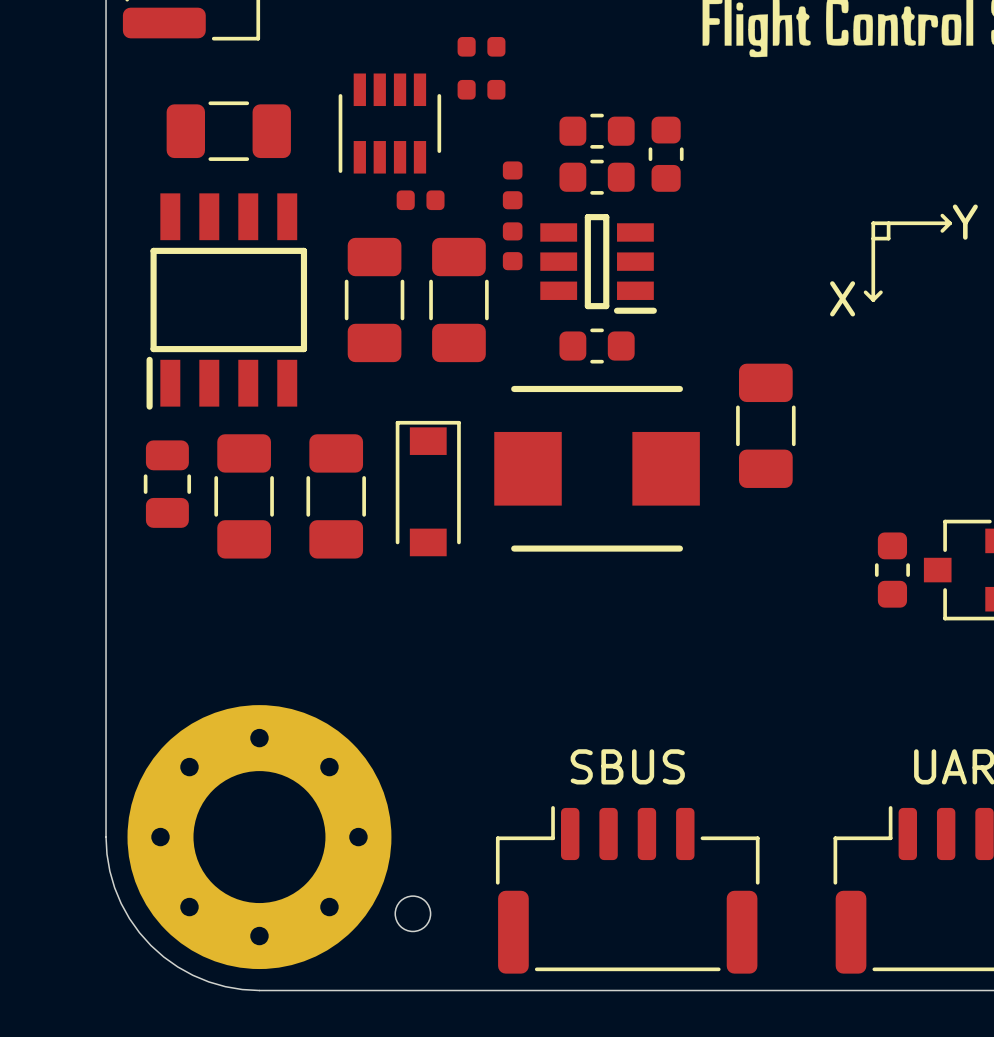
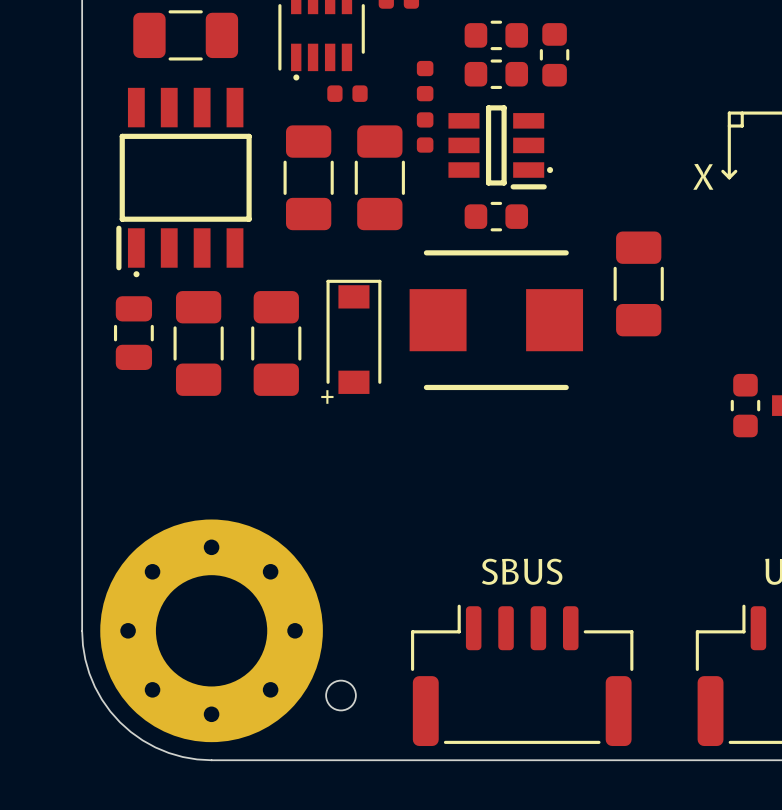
drawing: none -> [293, 74, 300, 81]
drawing: none -> [547, 167, 554, 174]
drawing: none -> [133, 271, 140, 278]
text: none -> + (327, 397)

